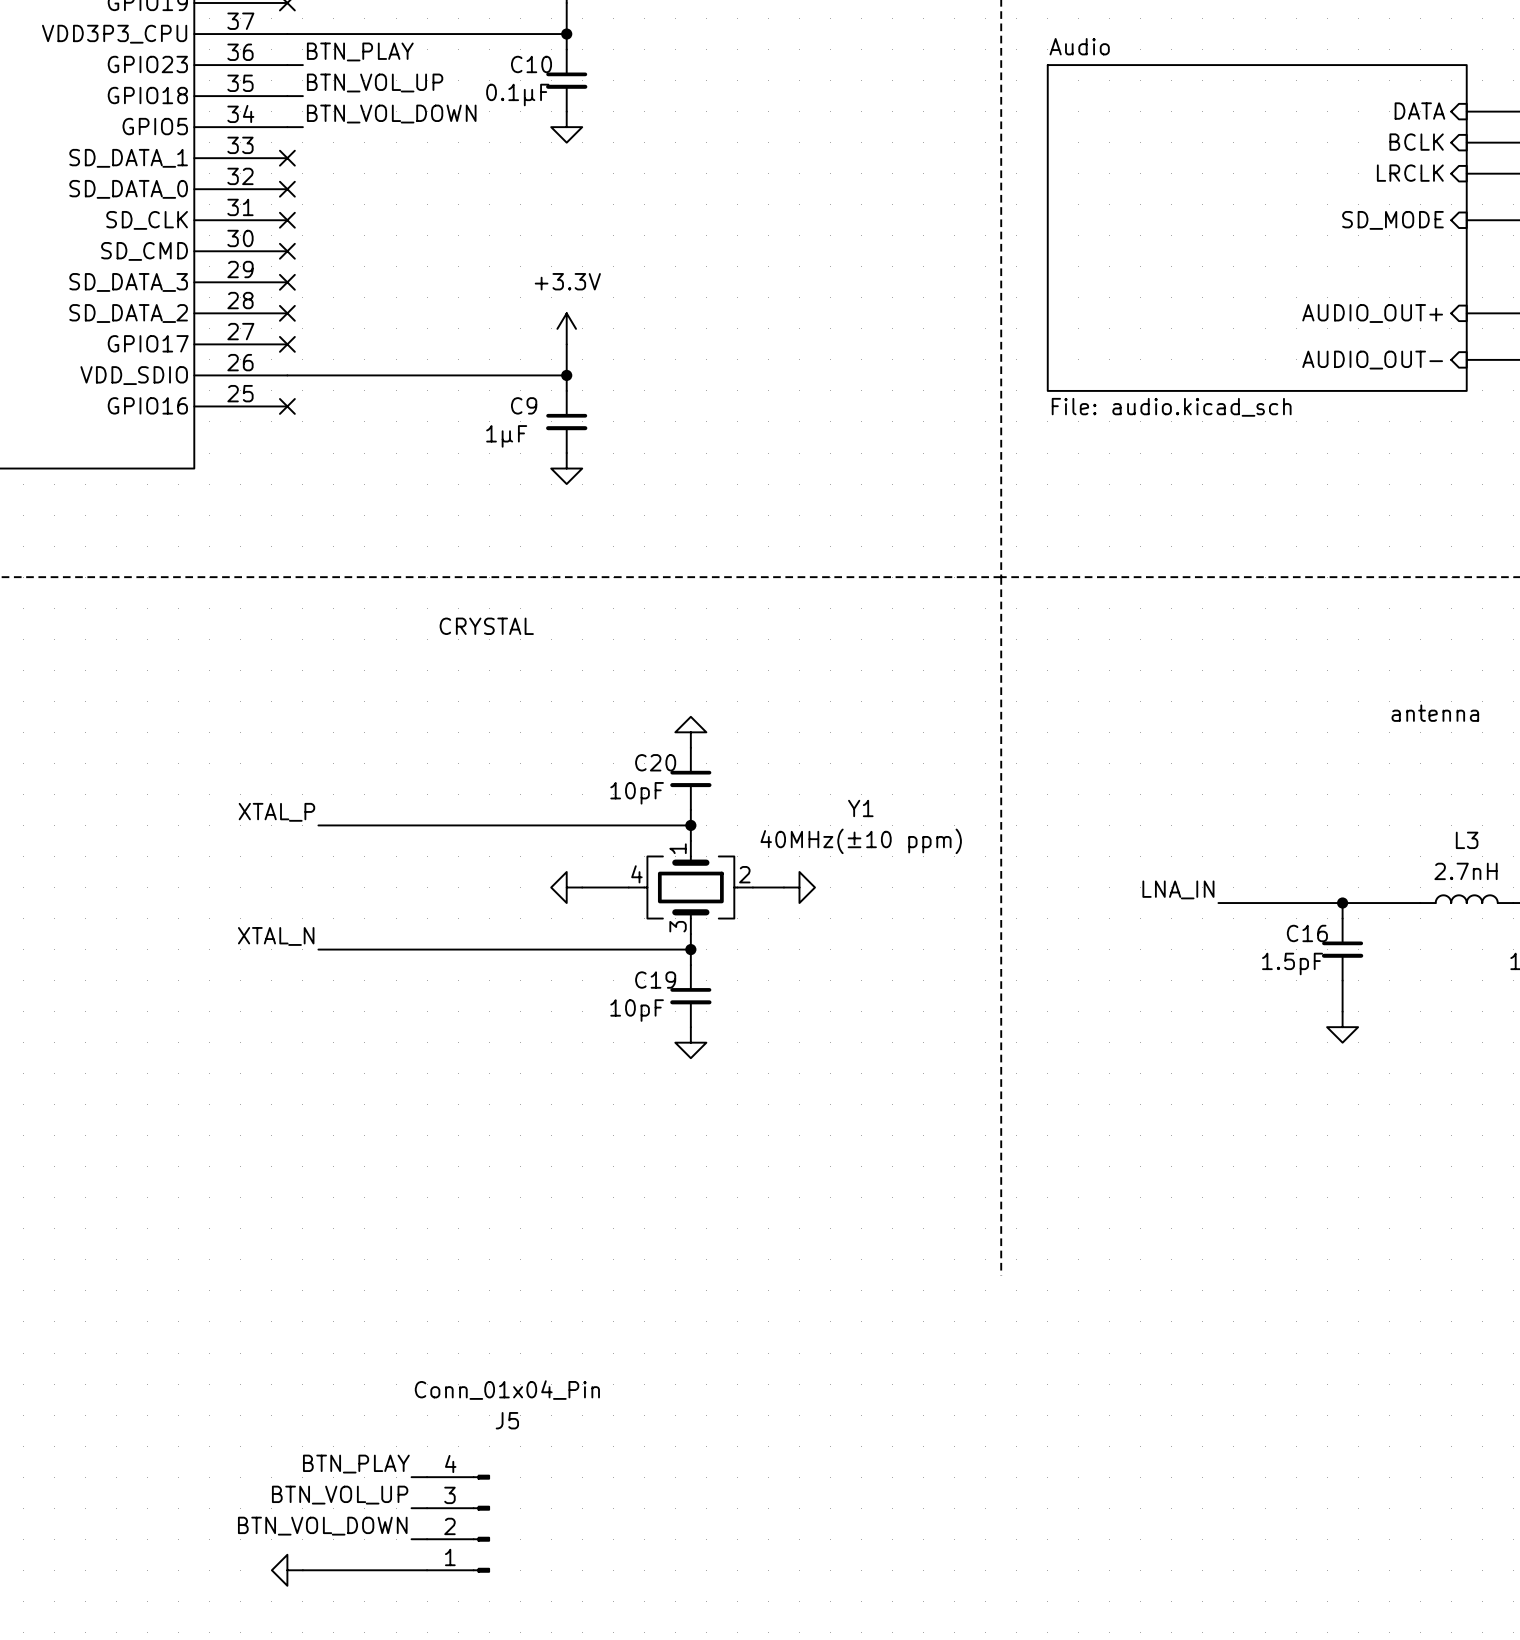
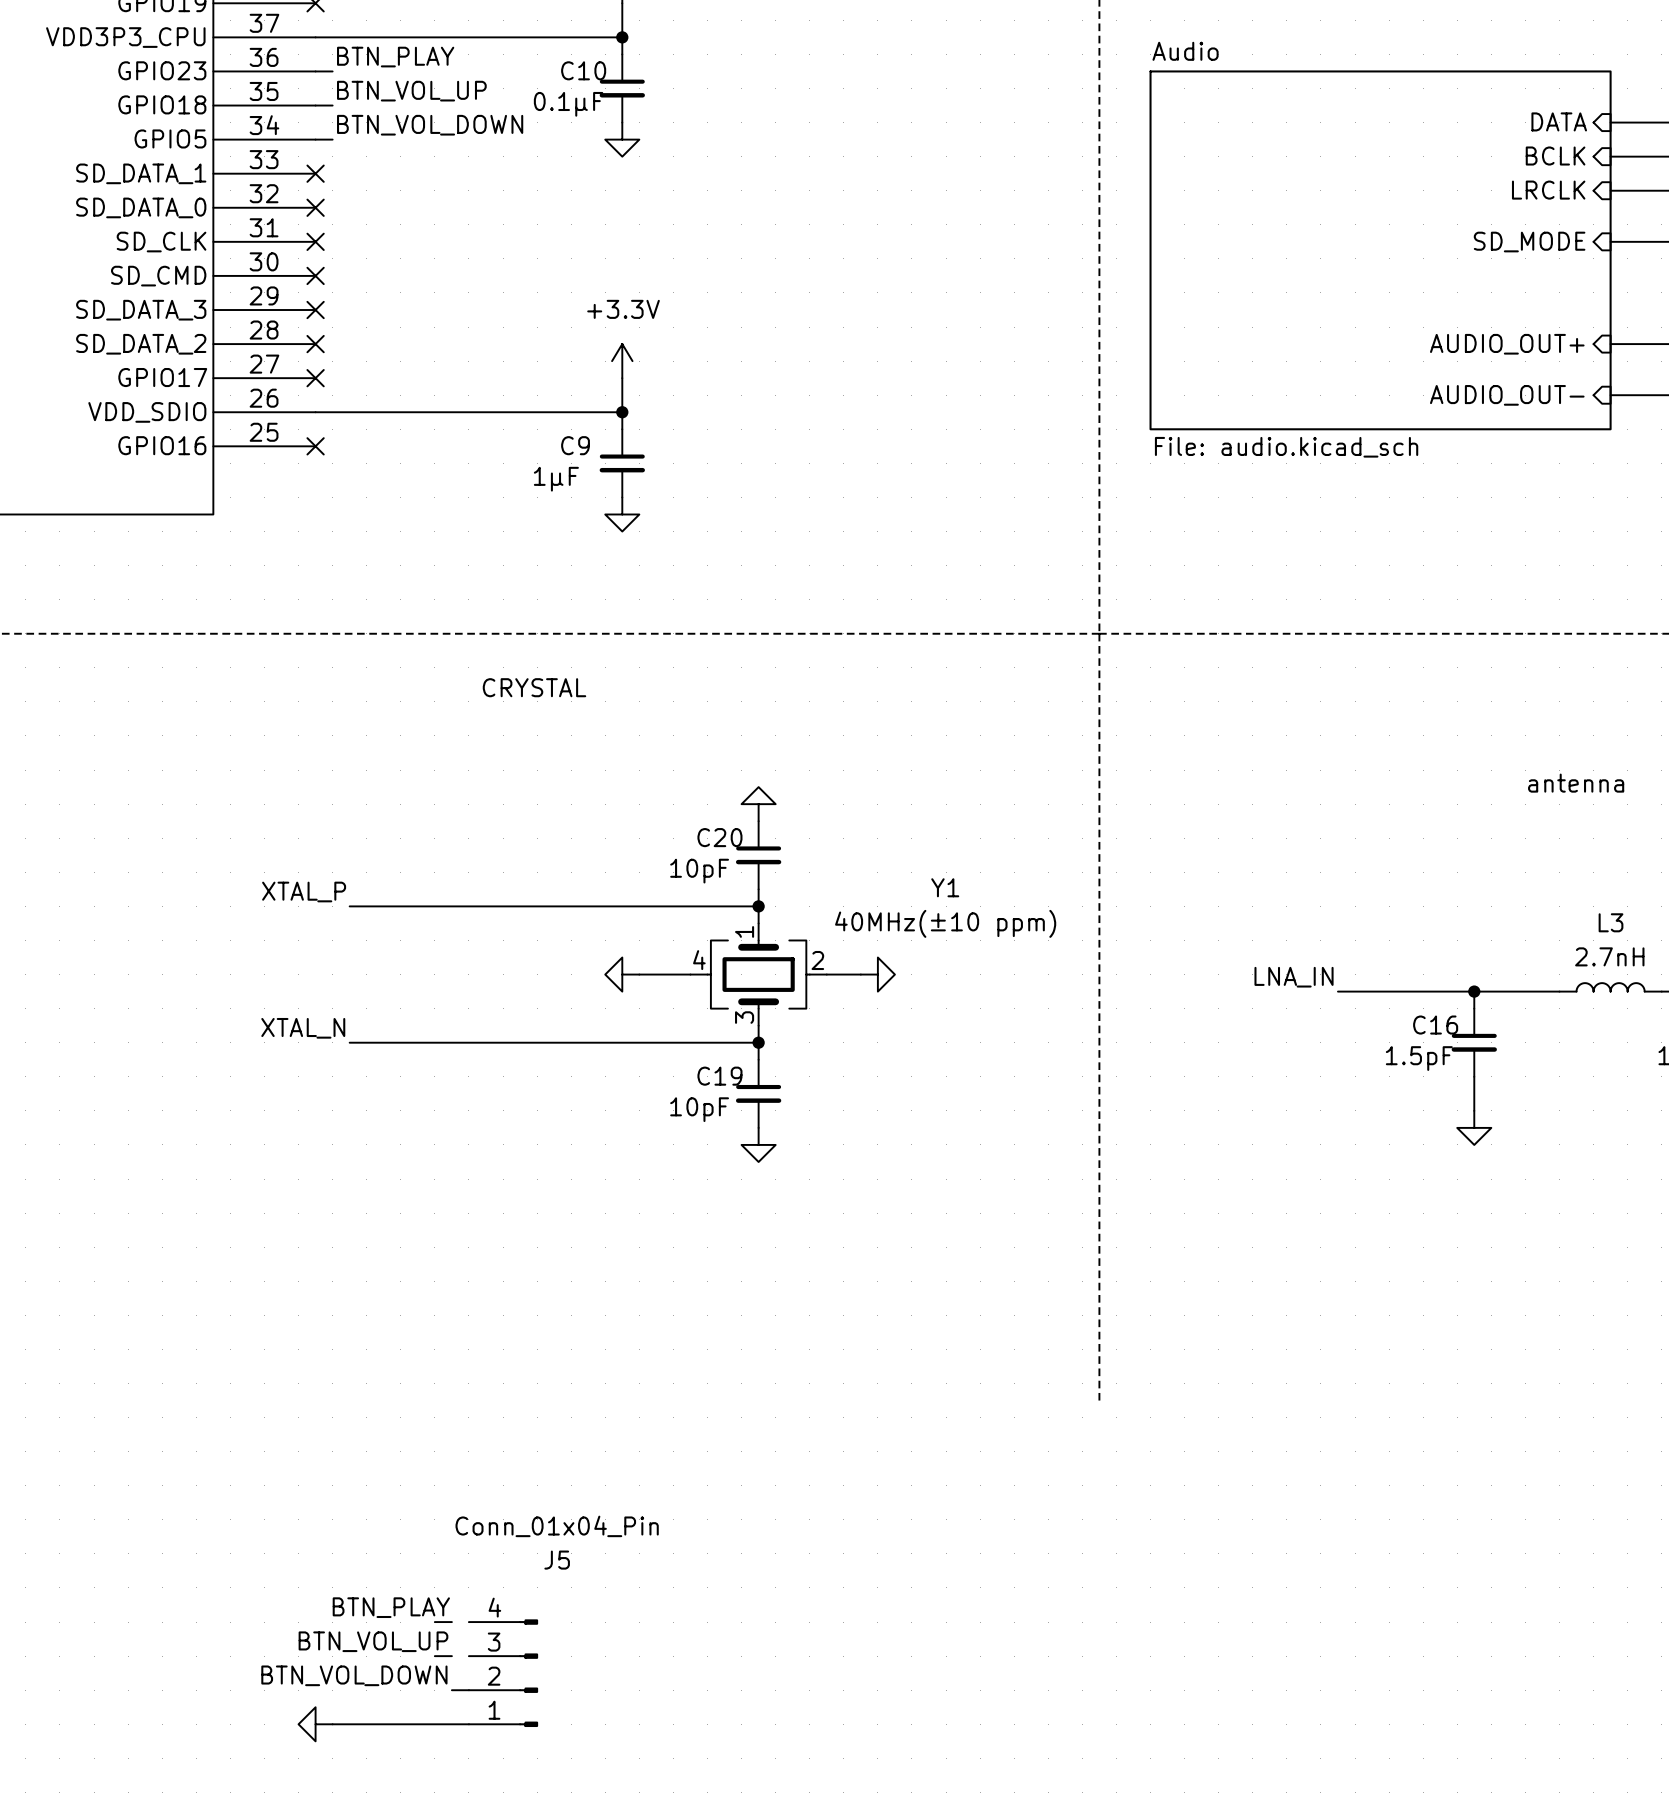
wire: (411, 1477) (427, 1477) -> (451, 1622) (434, 1622)
wire: (411, 1508) (427, 1508) -> (451, 1656) (434, 1656)

